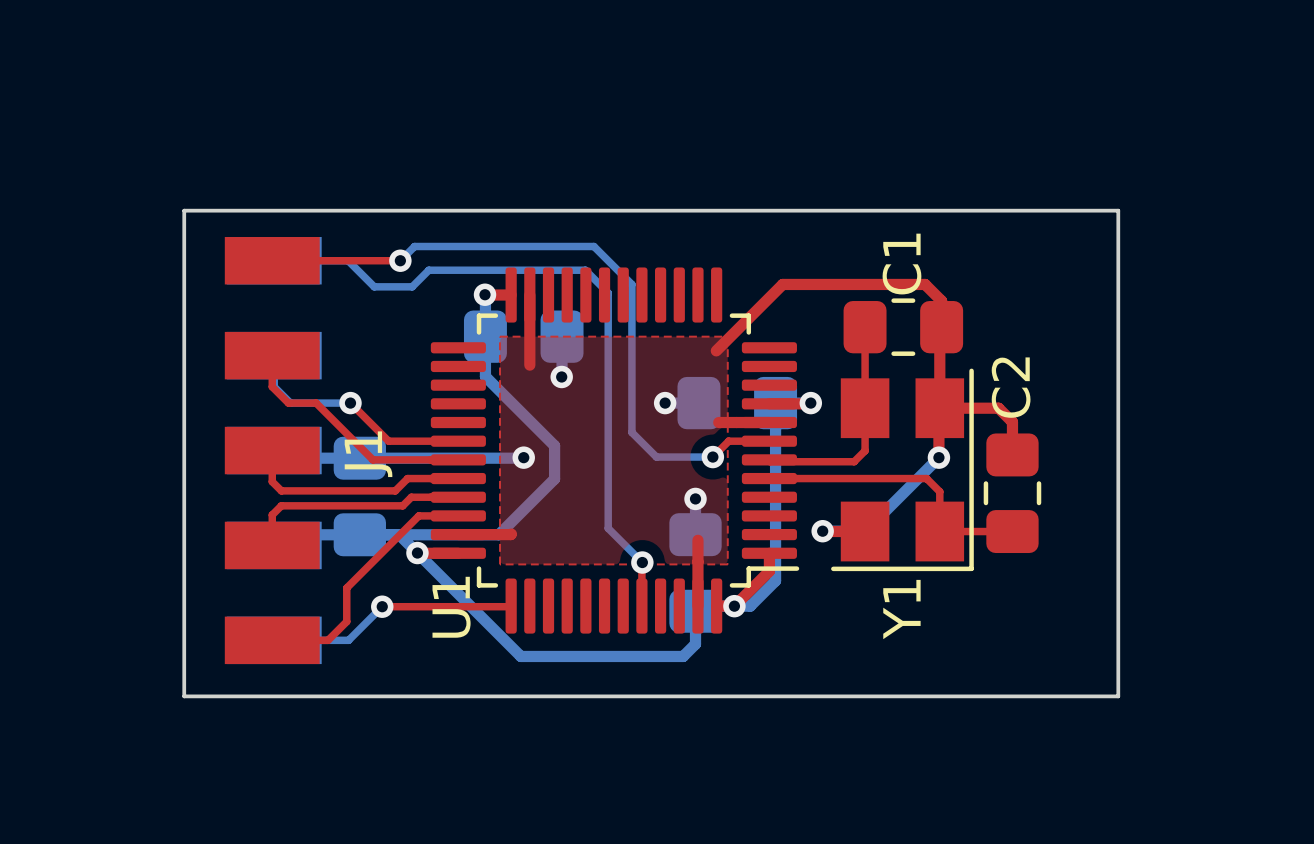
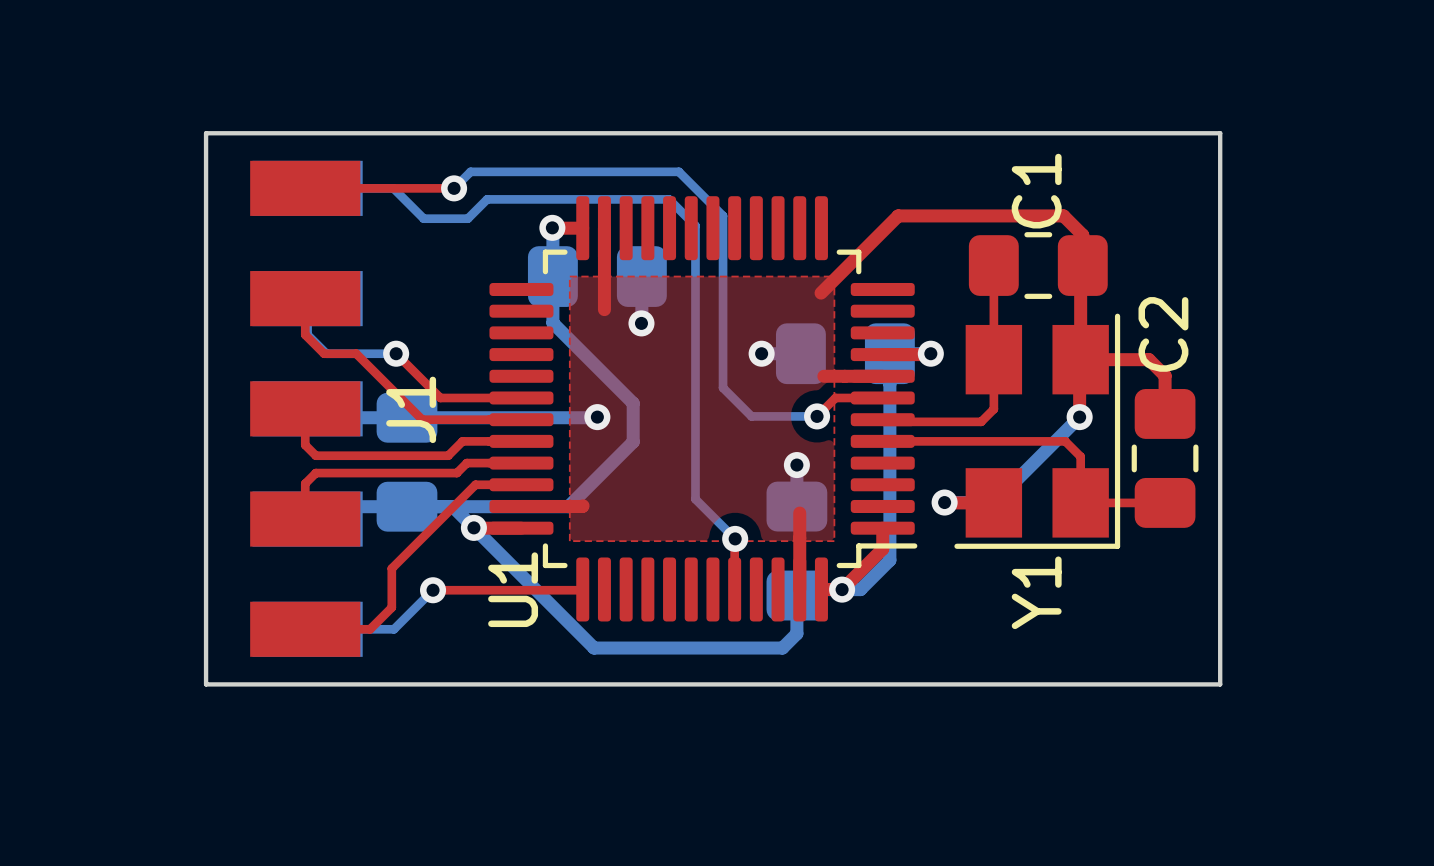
board edge: (184, 210) (184, 696) (1118, 696) (1118, 210) (184, 210) -> (206, 133) (206, 684) (1220, 684) (1220, 133) (206, 133)

